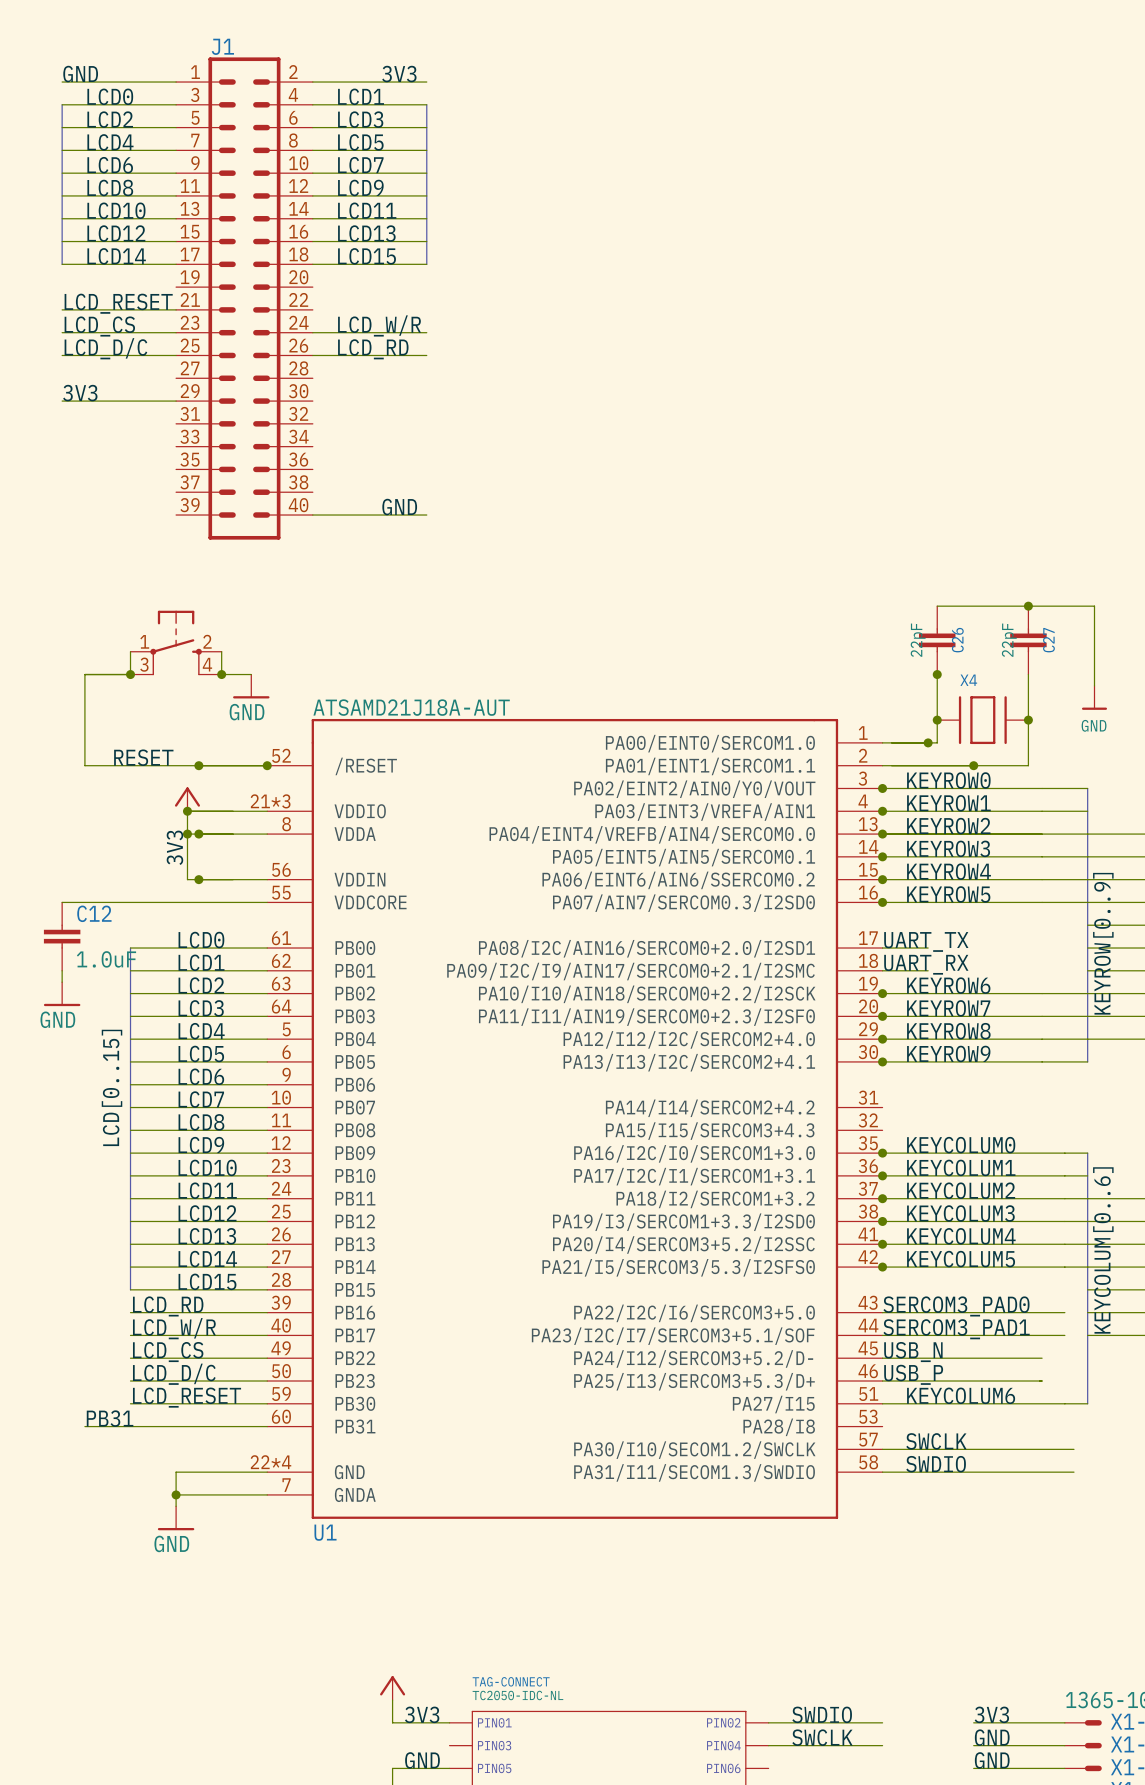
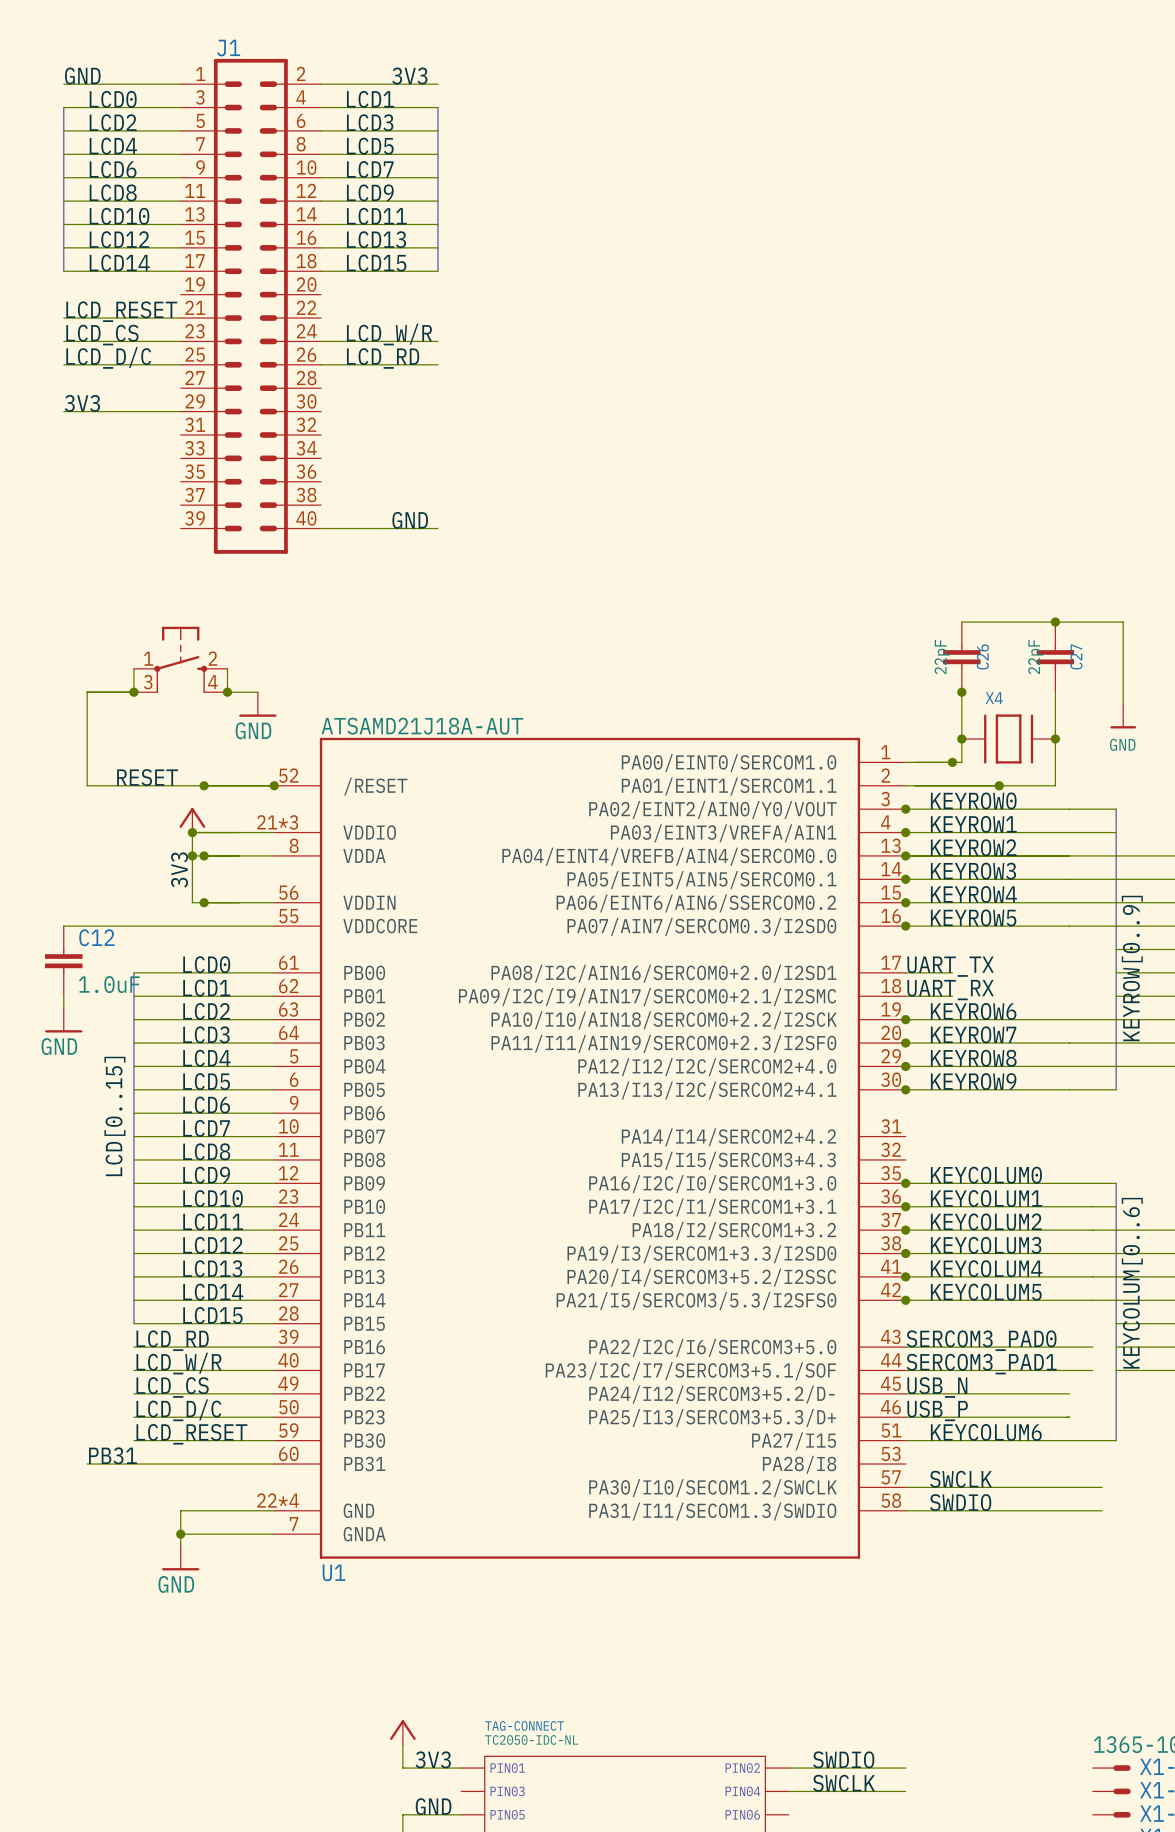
label: 3V3 (991, 1714) -> none
wire: (973, 1722) (1064, 1722) -> none
label: GND (992, 1737) -> none
wire: (973, 1745) (1064, 1745) -> none
label: GND (992, 1760) -> none
wire: (973, 1768) (1064, 1768) -> none

